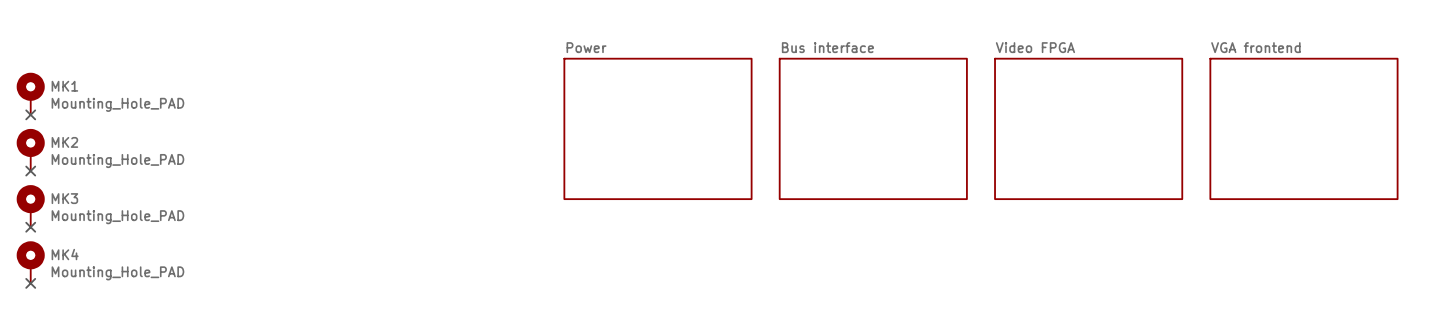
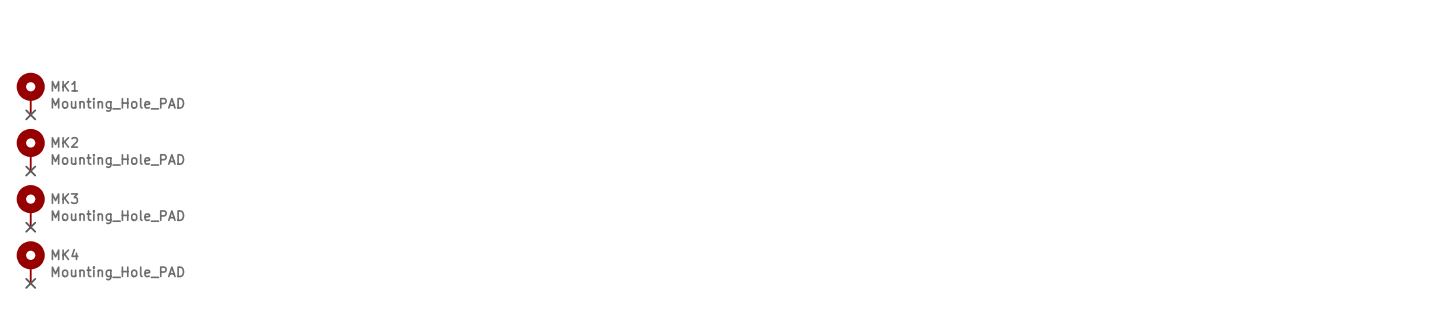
sheet Power: (657, 128) -> none
sheet Bus interface: (873, 128) -> none
sheet Video FPGA: (1088, 128) -> none
sheet VGA frontend: (1303, 128) -> none

